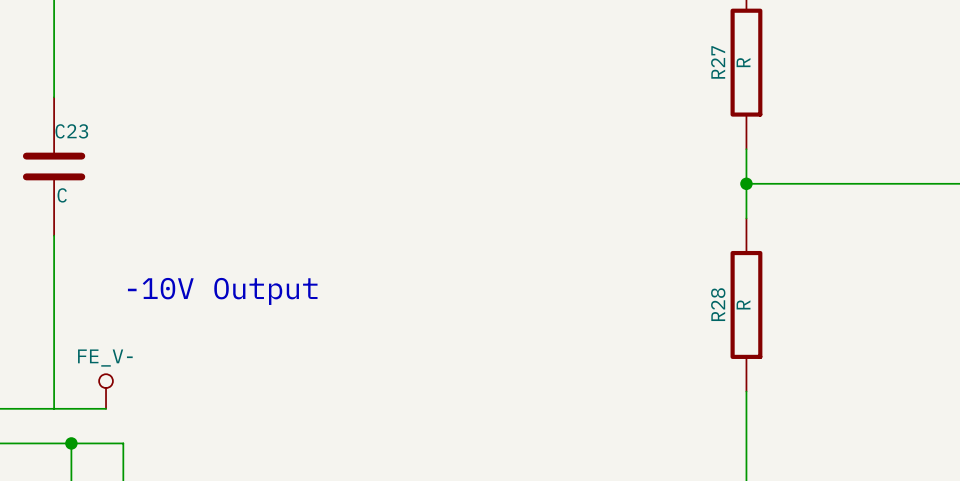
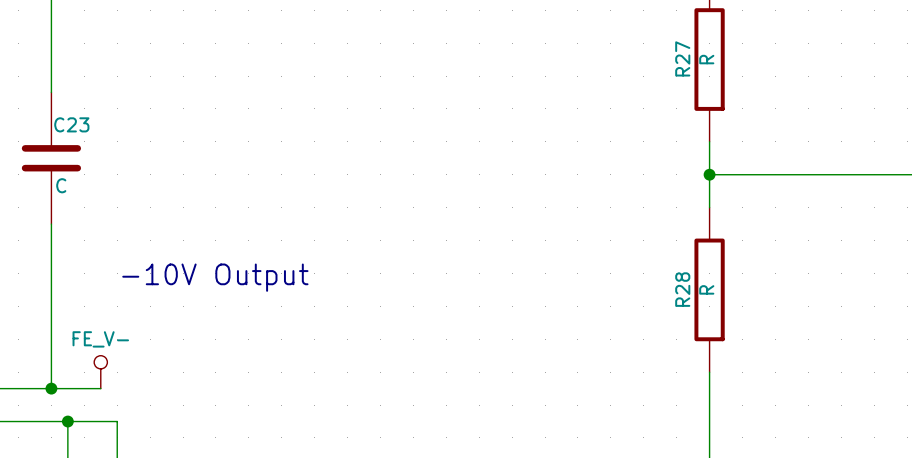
junction: none -> (51, 388)

